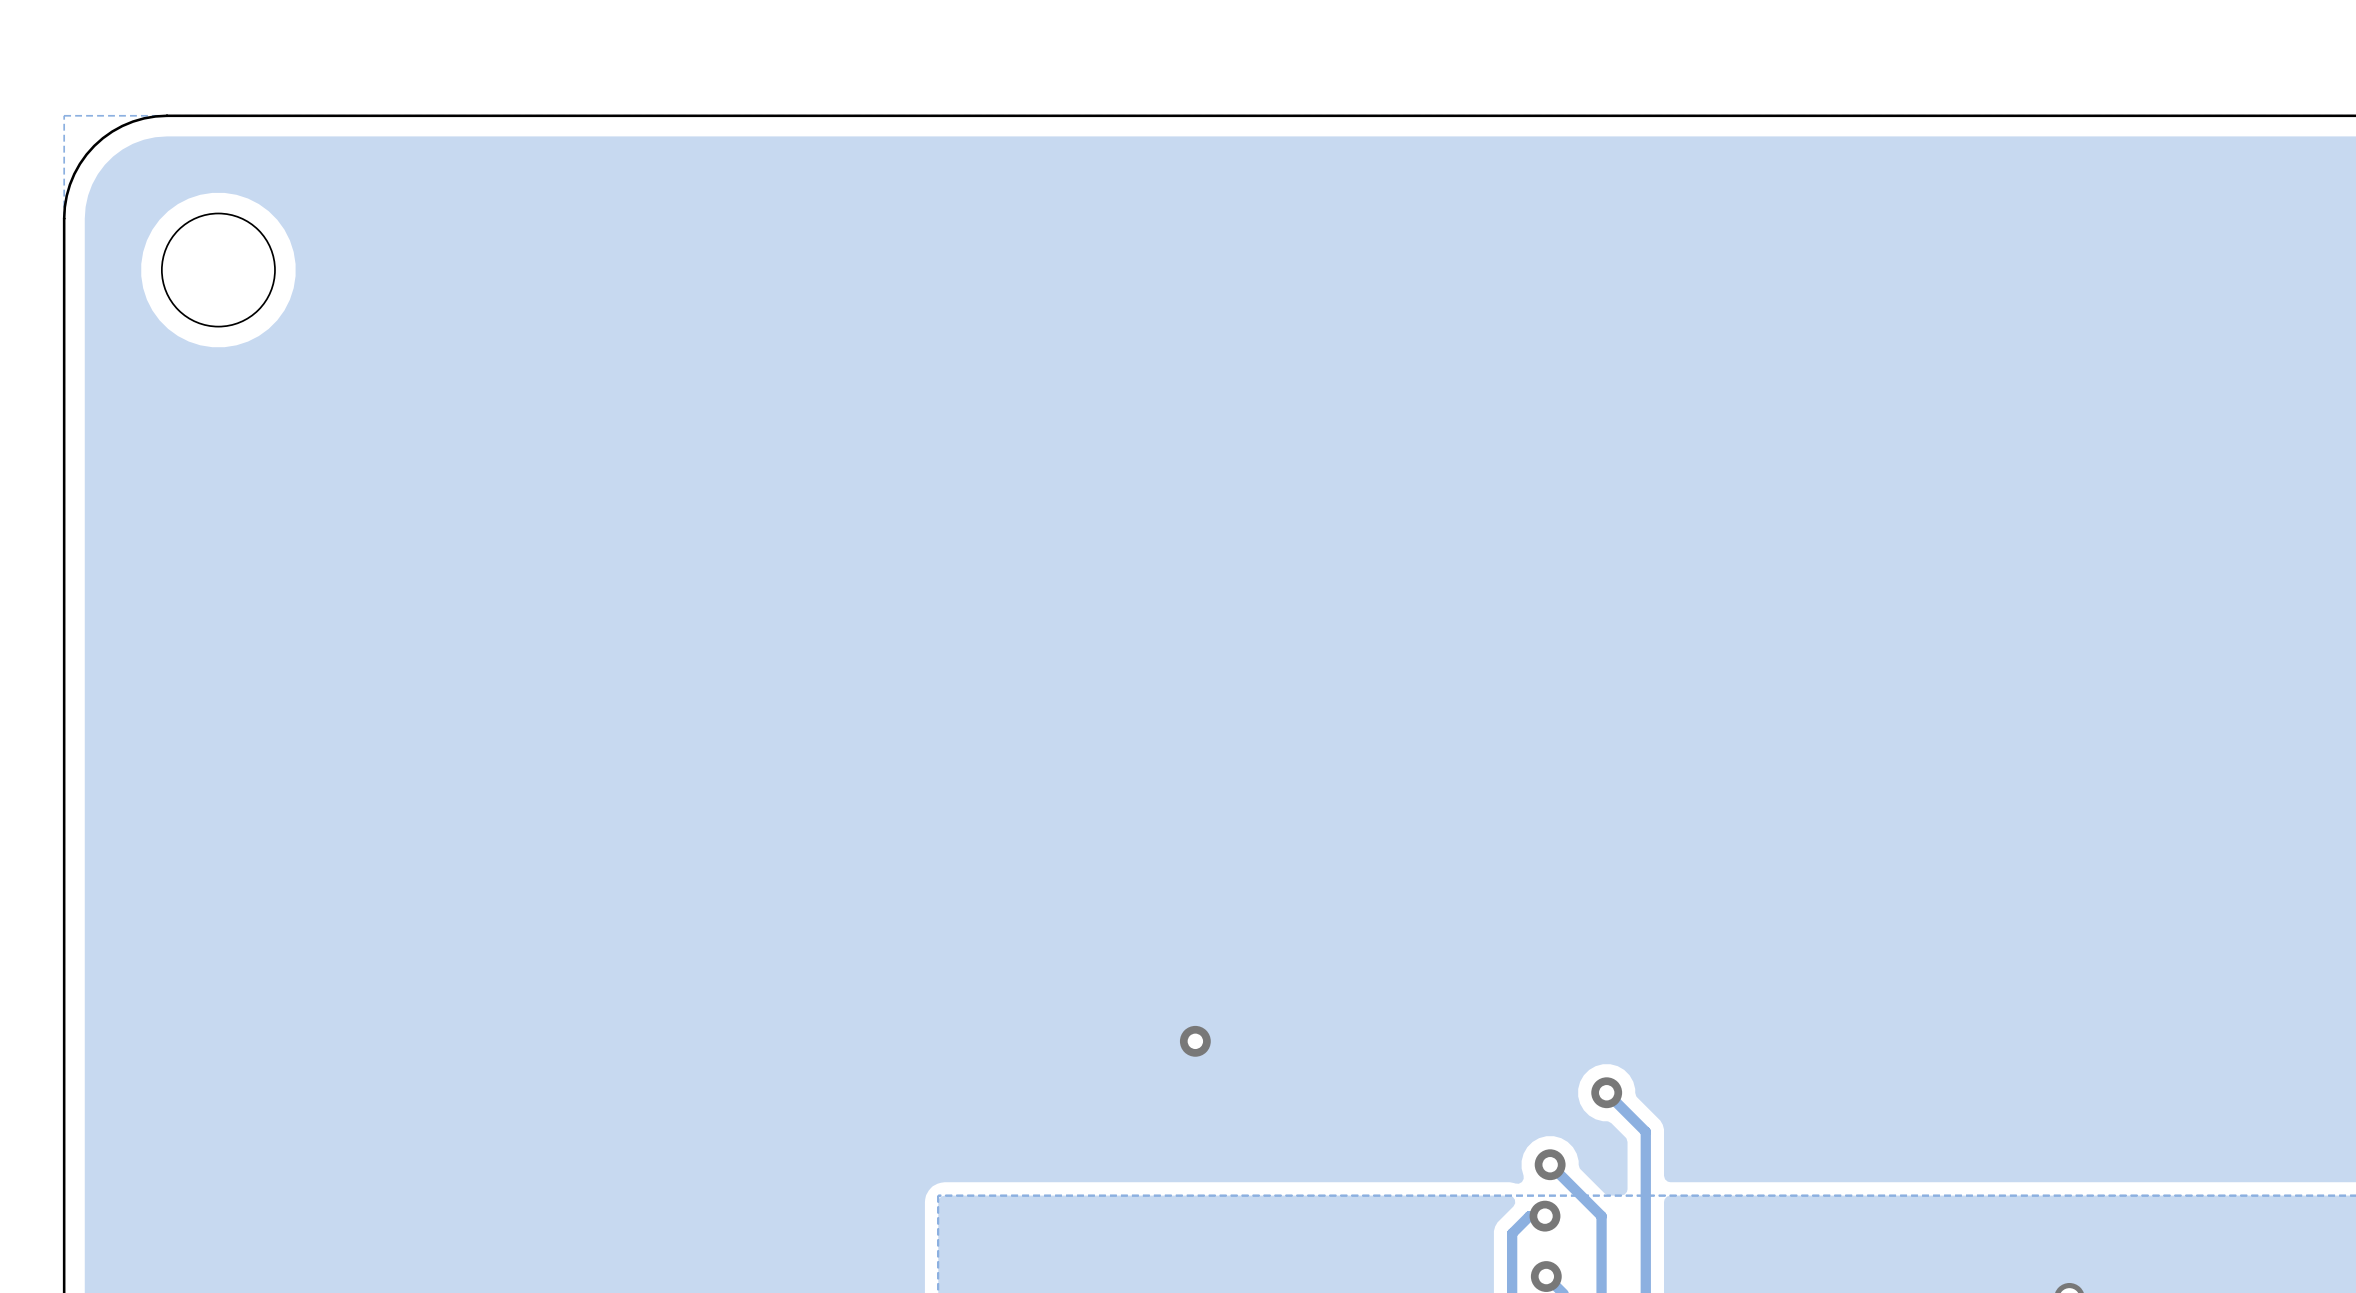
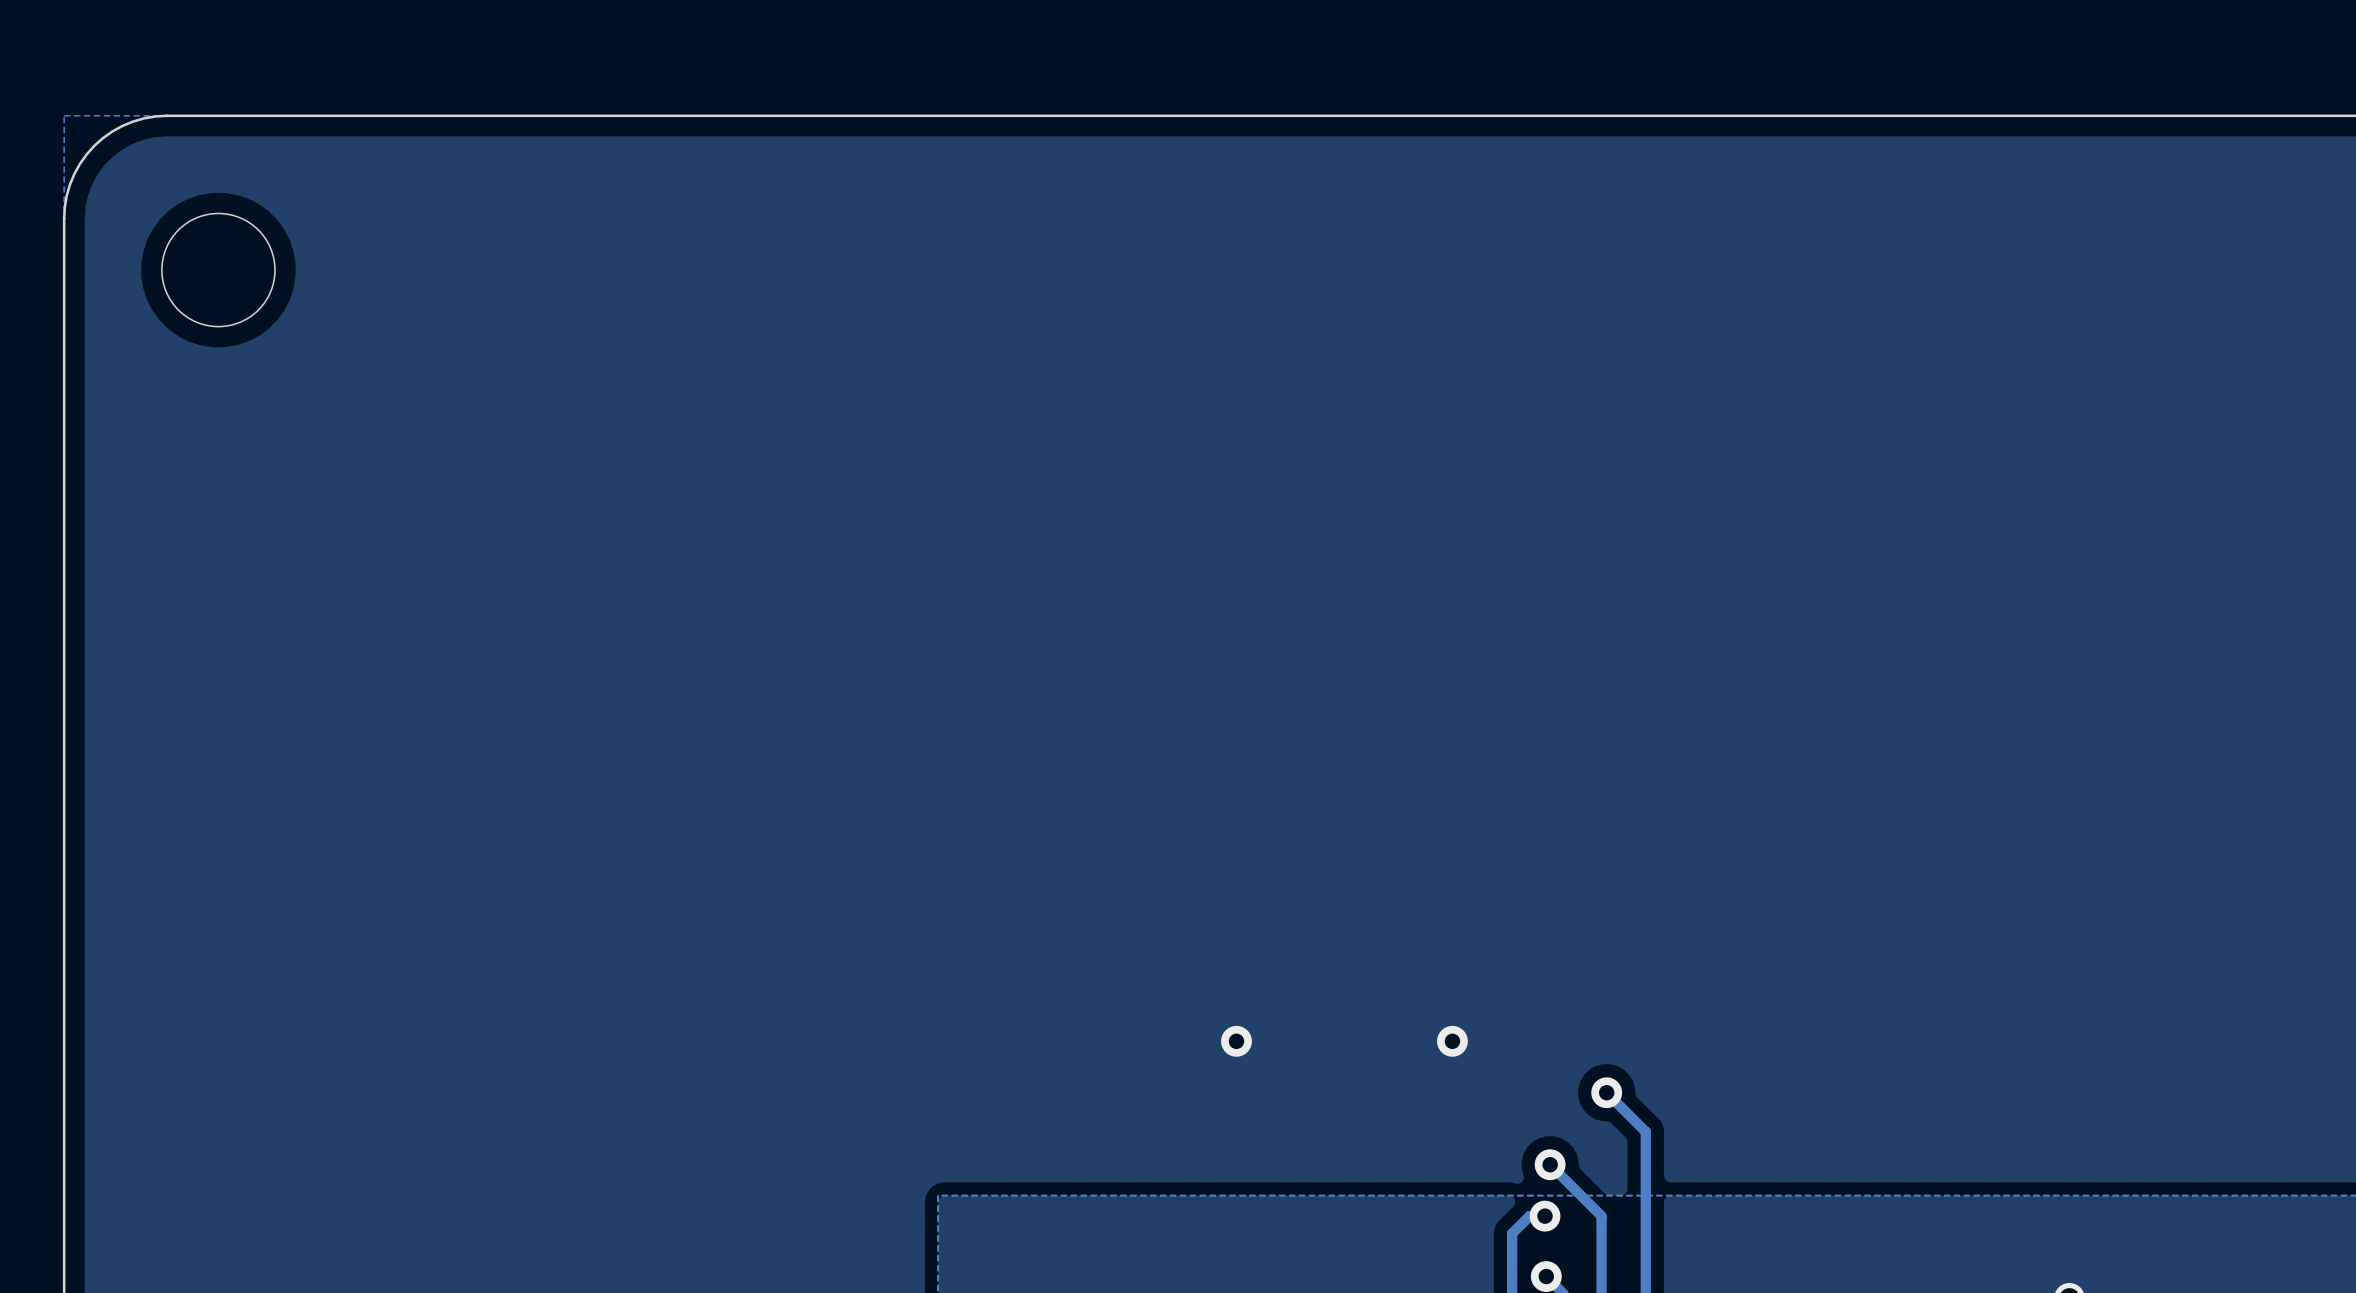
via position: (1195, 1041) -> (1236, 1041)
via: none -> (1452, 1041)

